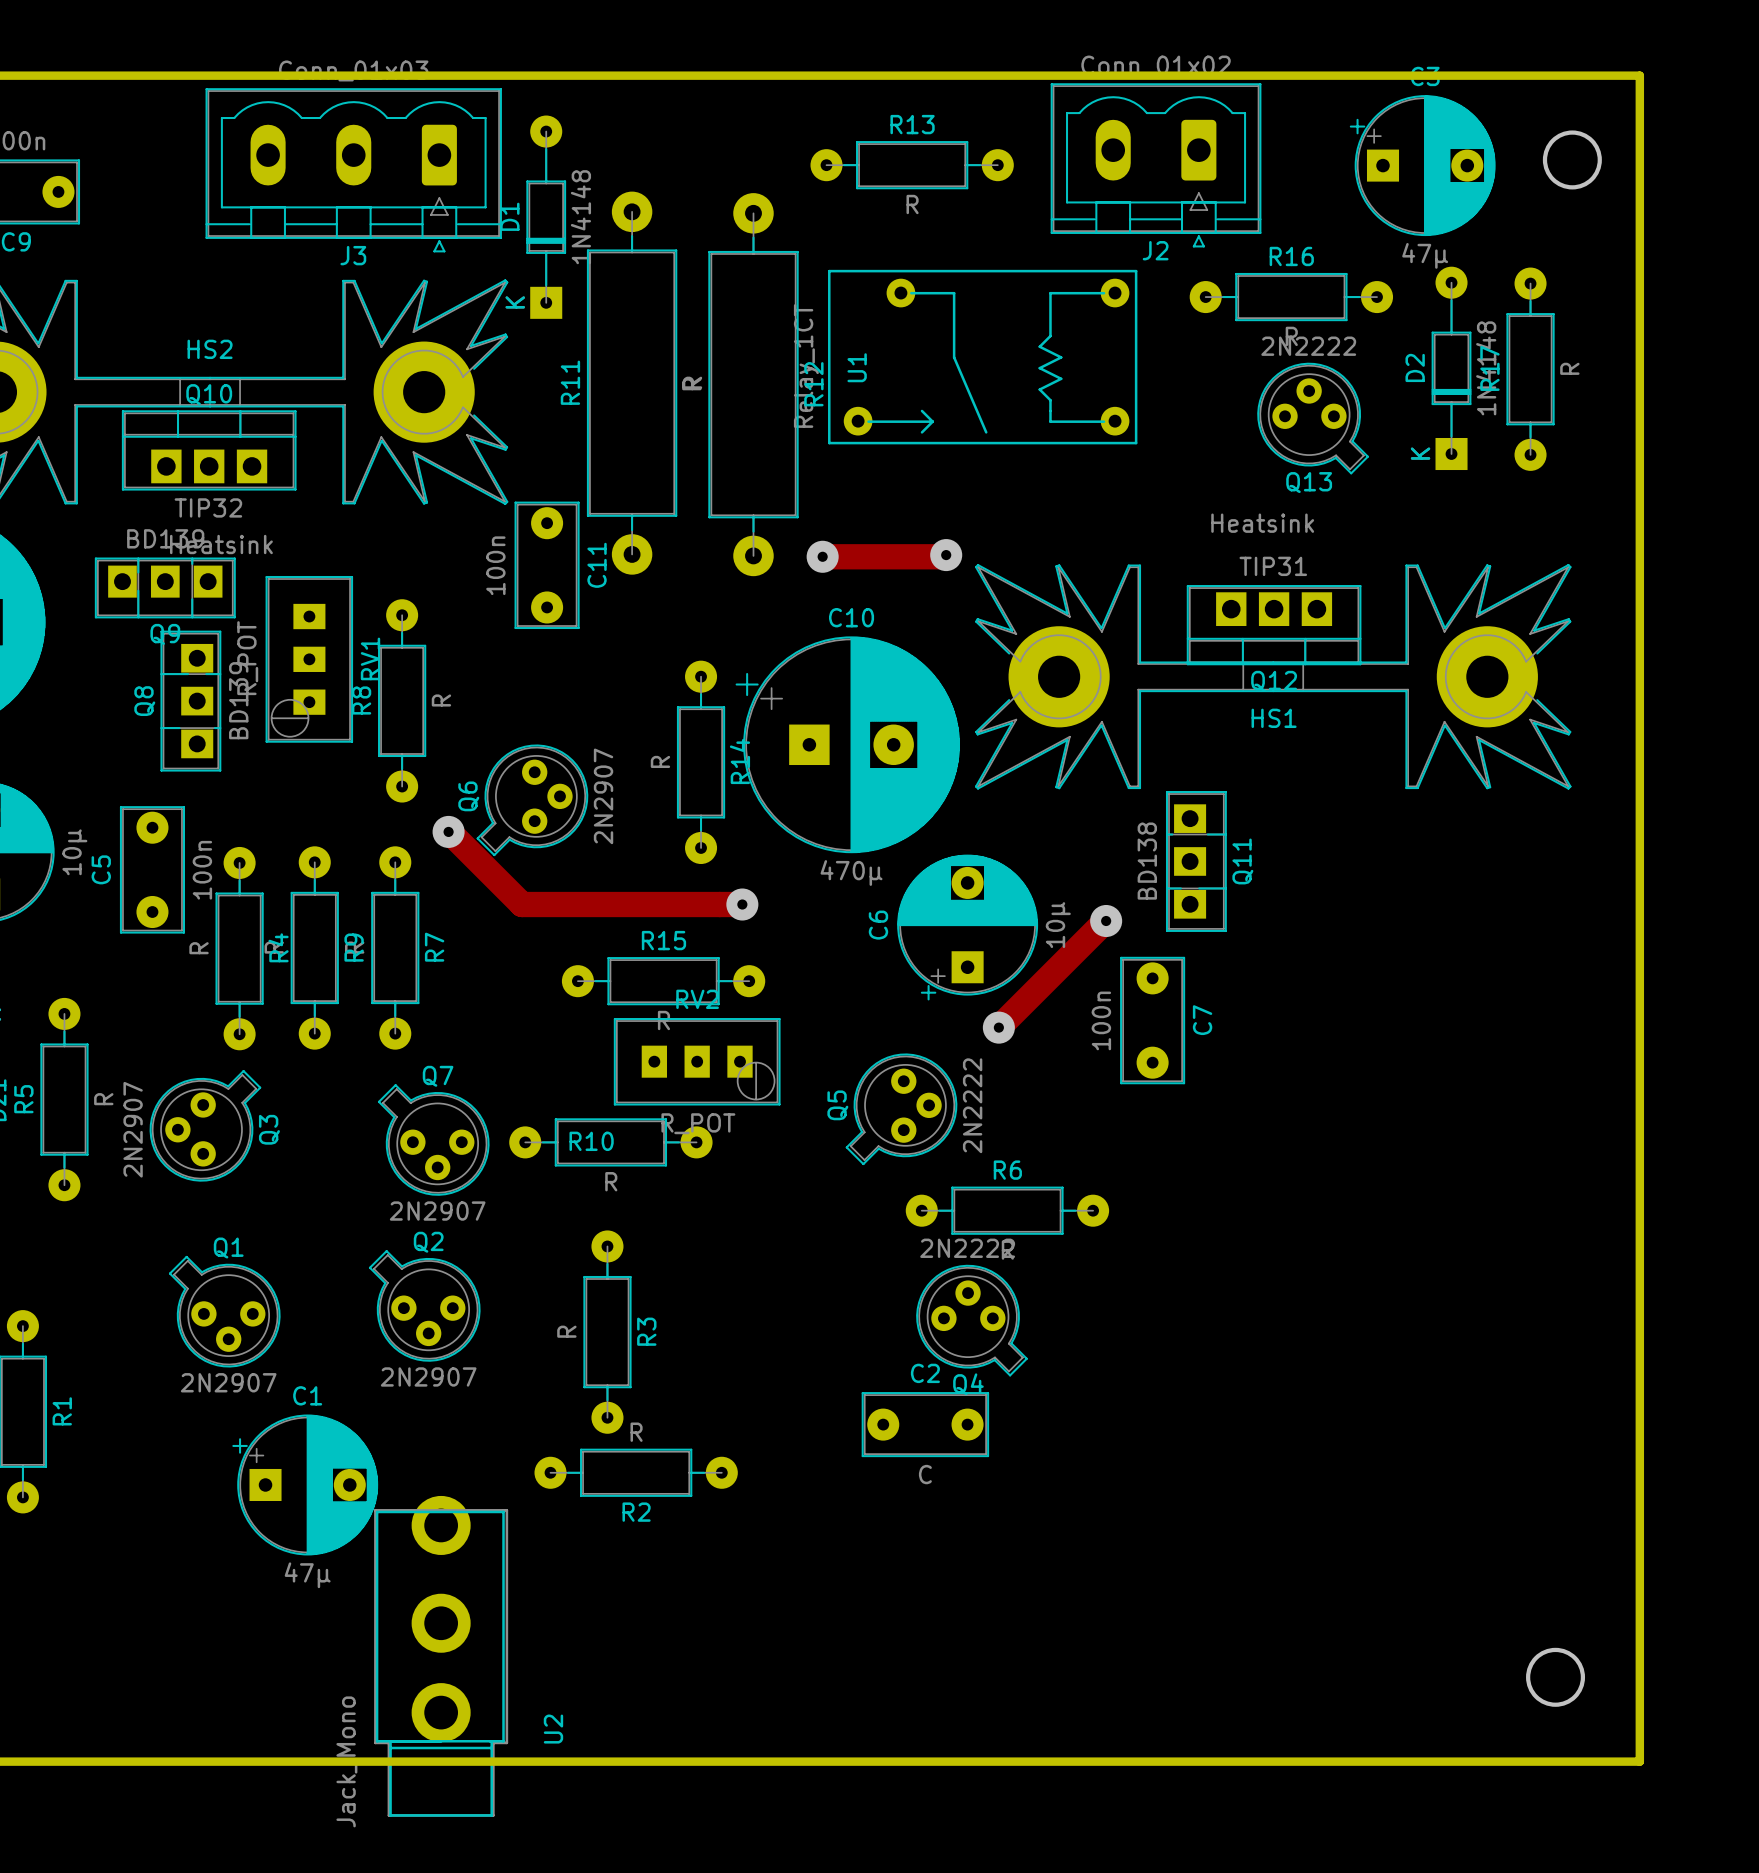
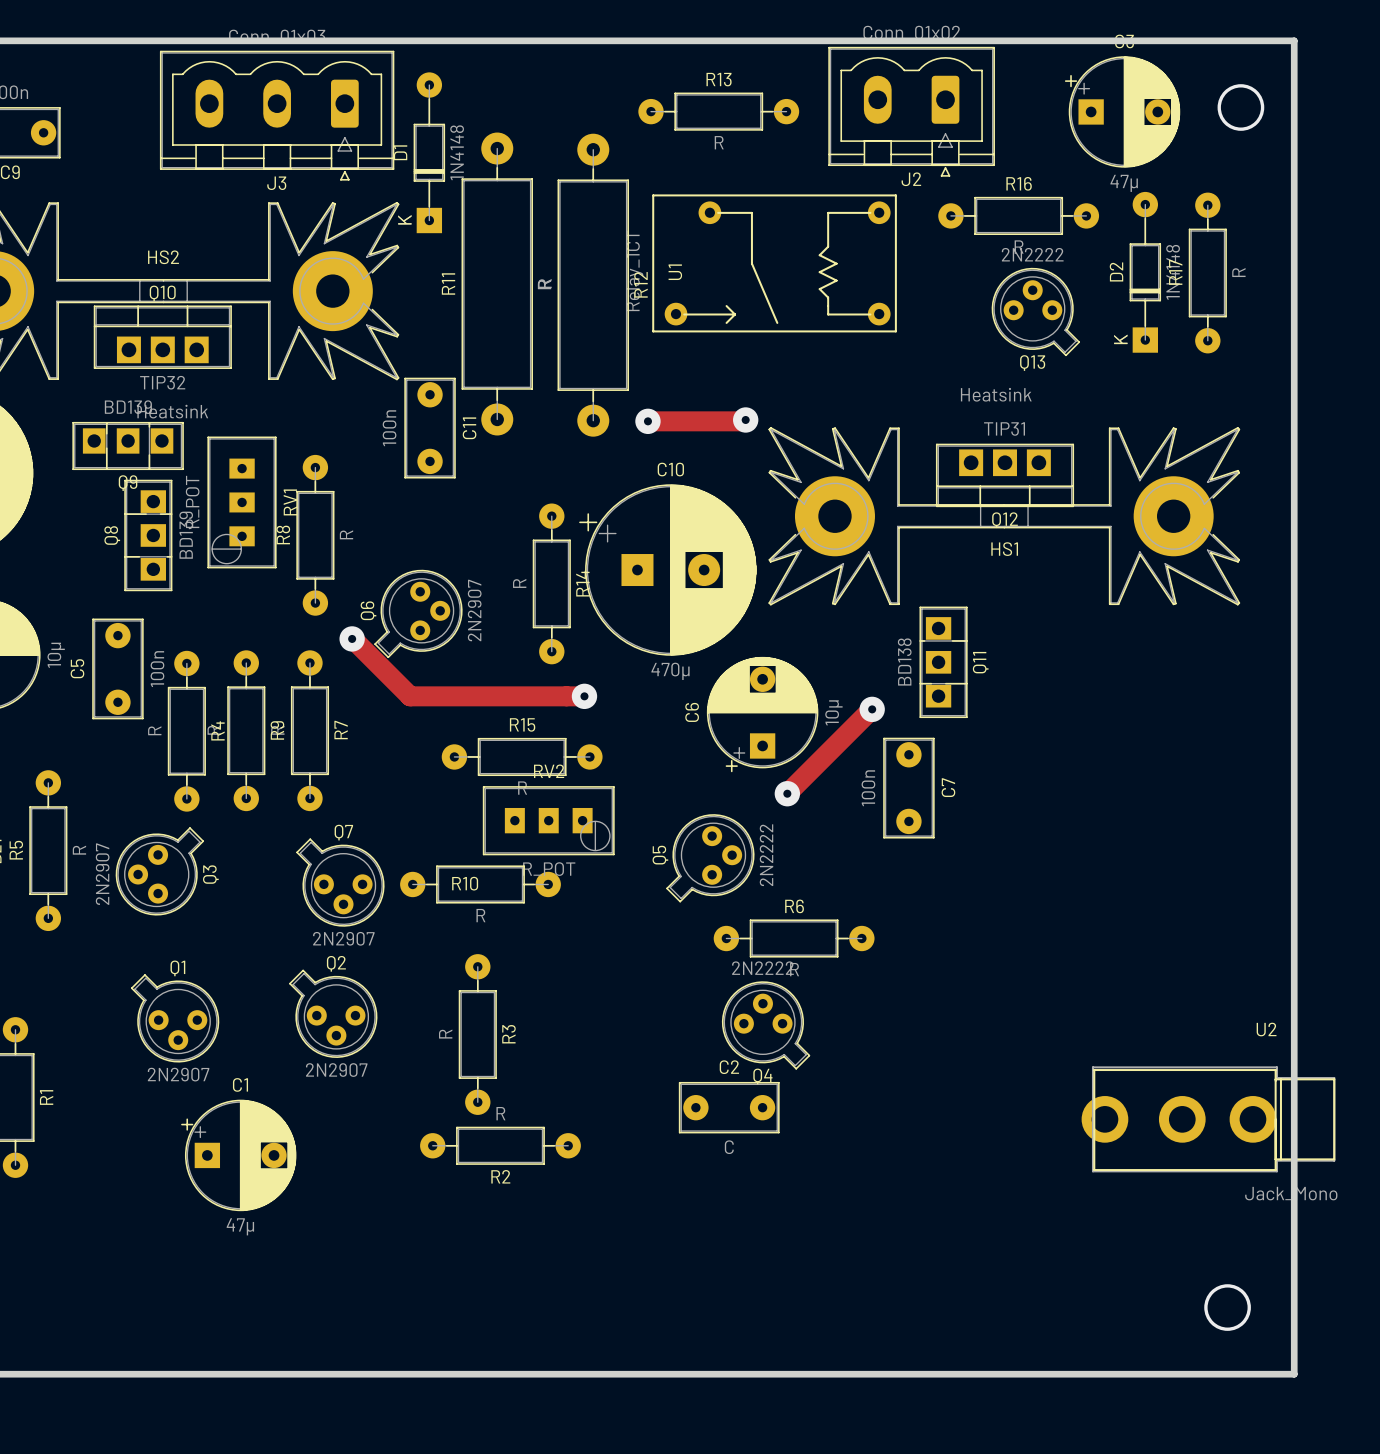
U2 rotation: 0° (441, 1656) -> 90° counterclockwise (1208, 1119)
U2 position: (441, 1656) -> (1208, 1119)

